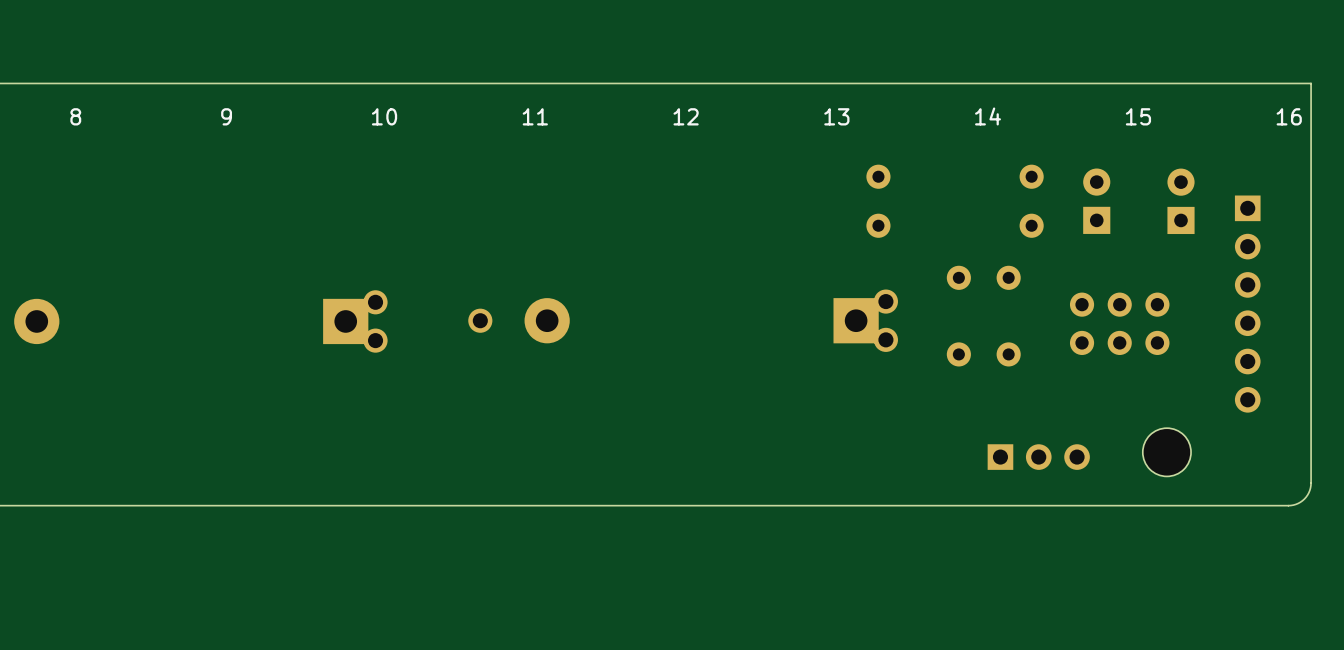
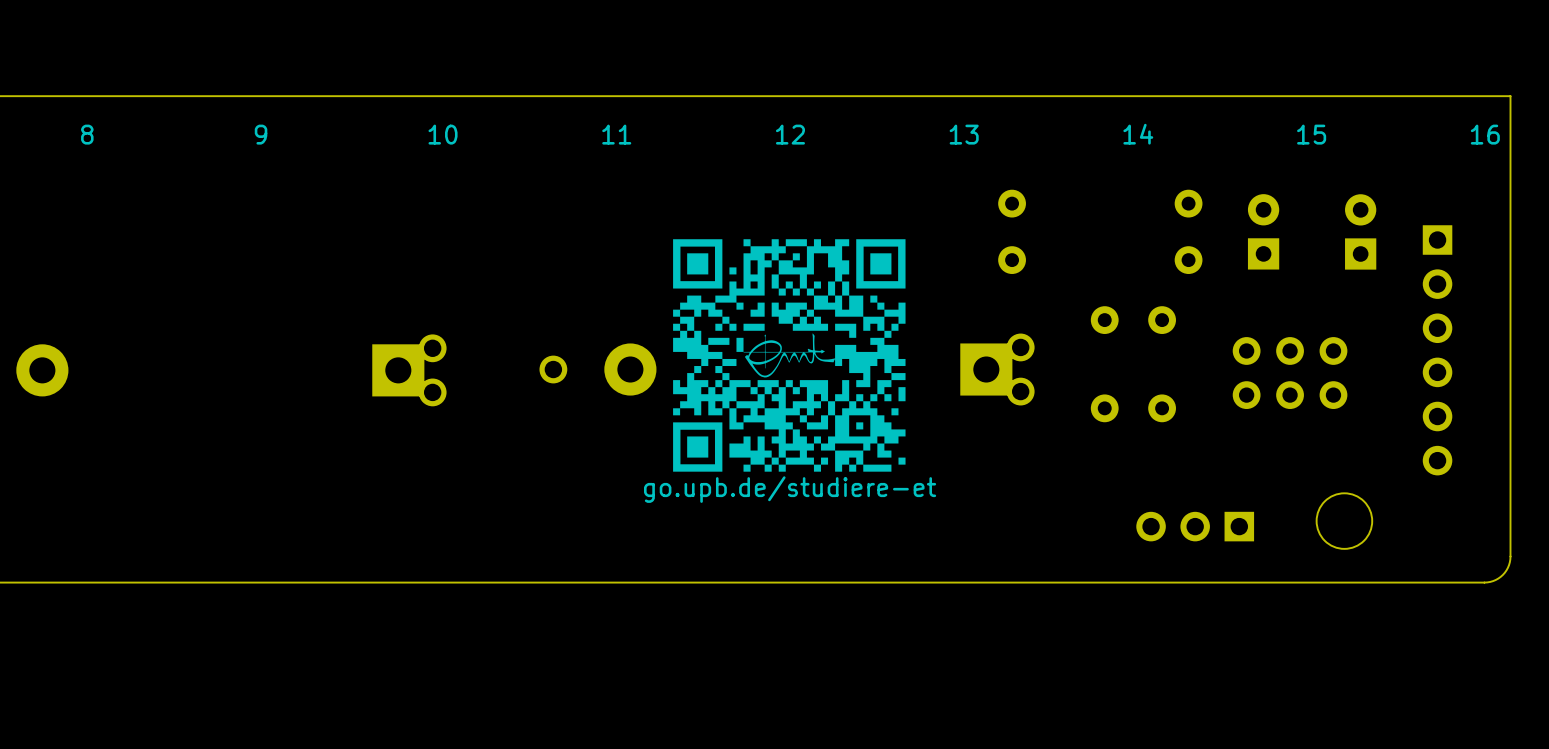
drawing: none -> [673, 239, 906, 472]
part rotation: 0° (1038, 457) -> 180° (1195, 526)

